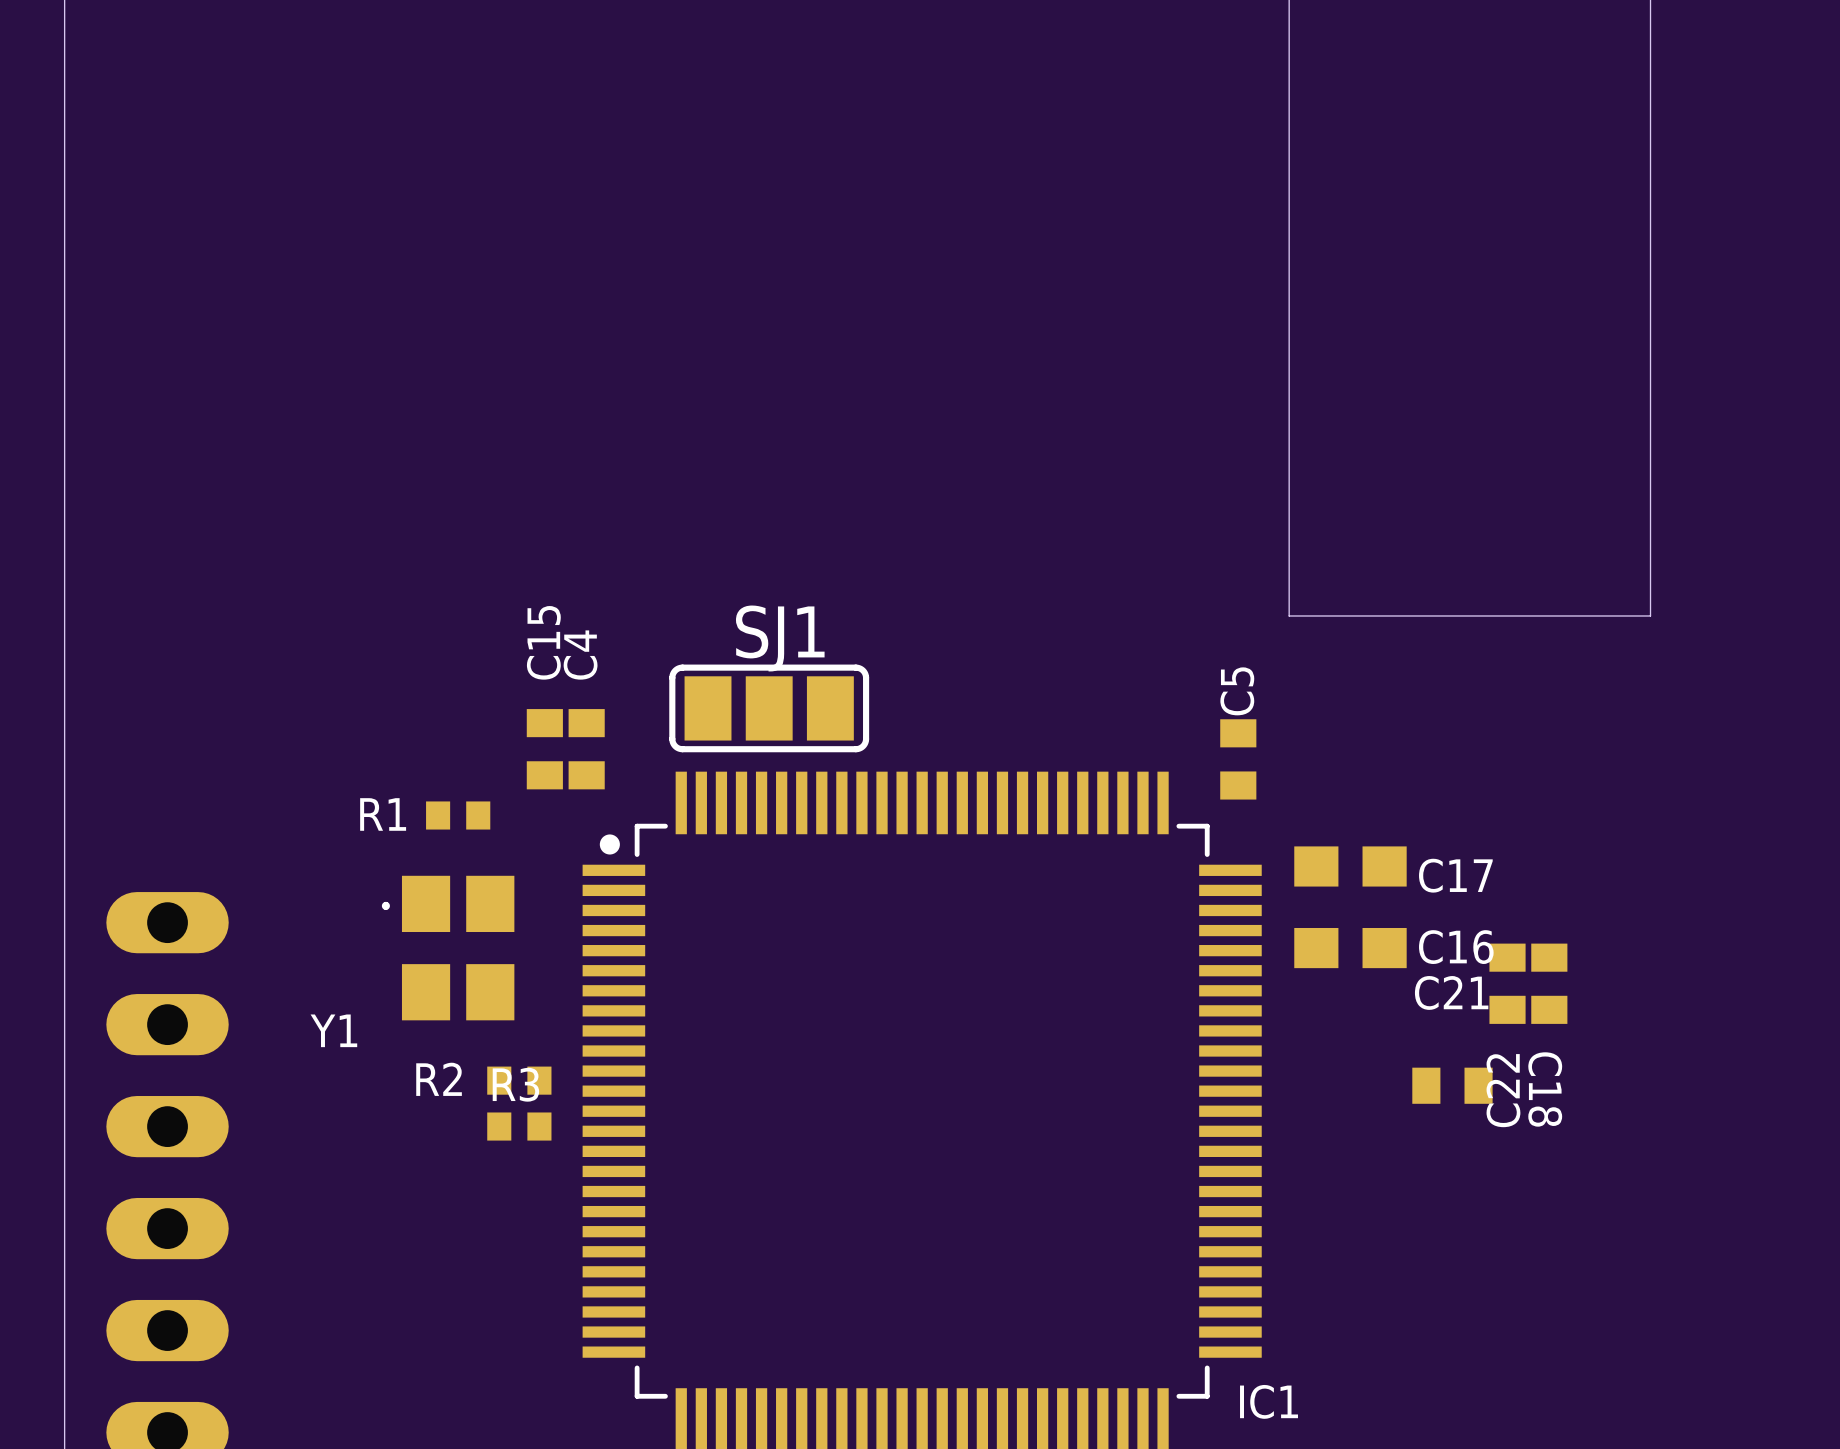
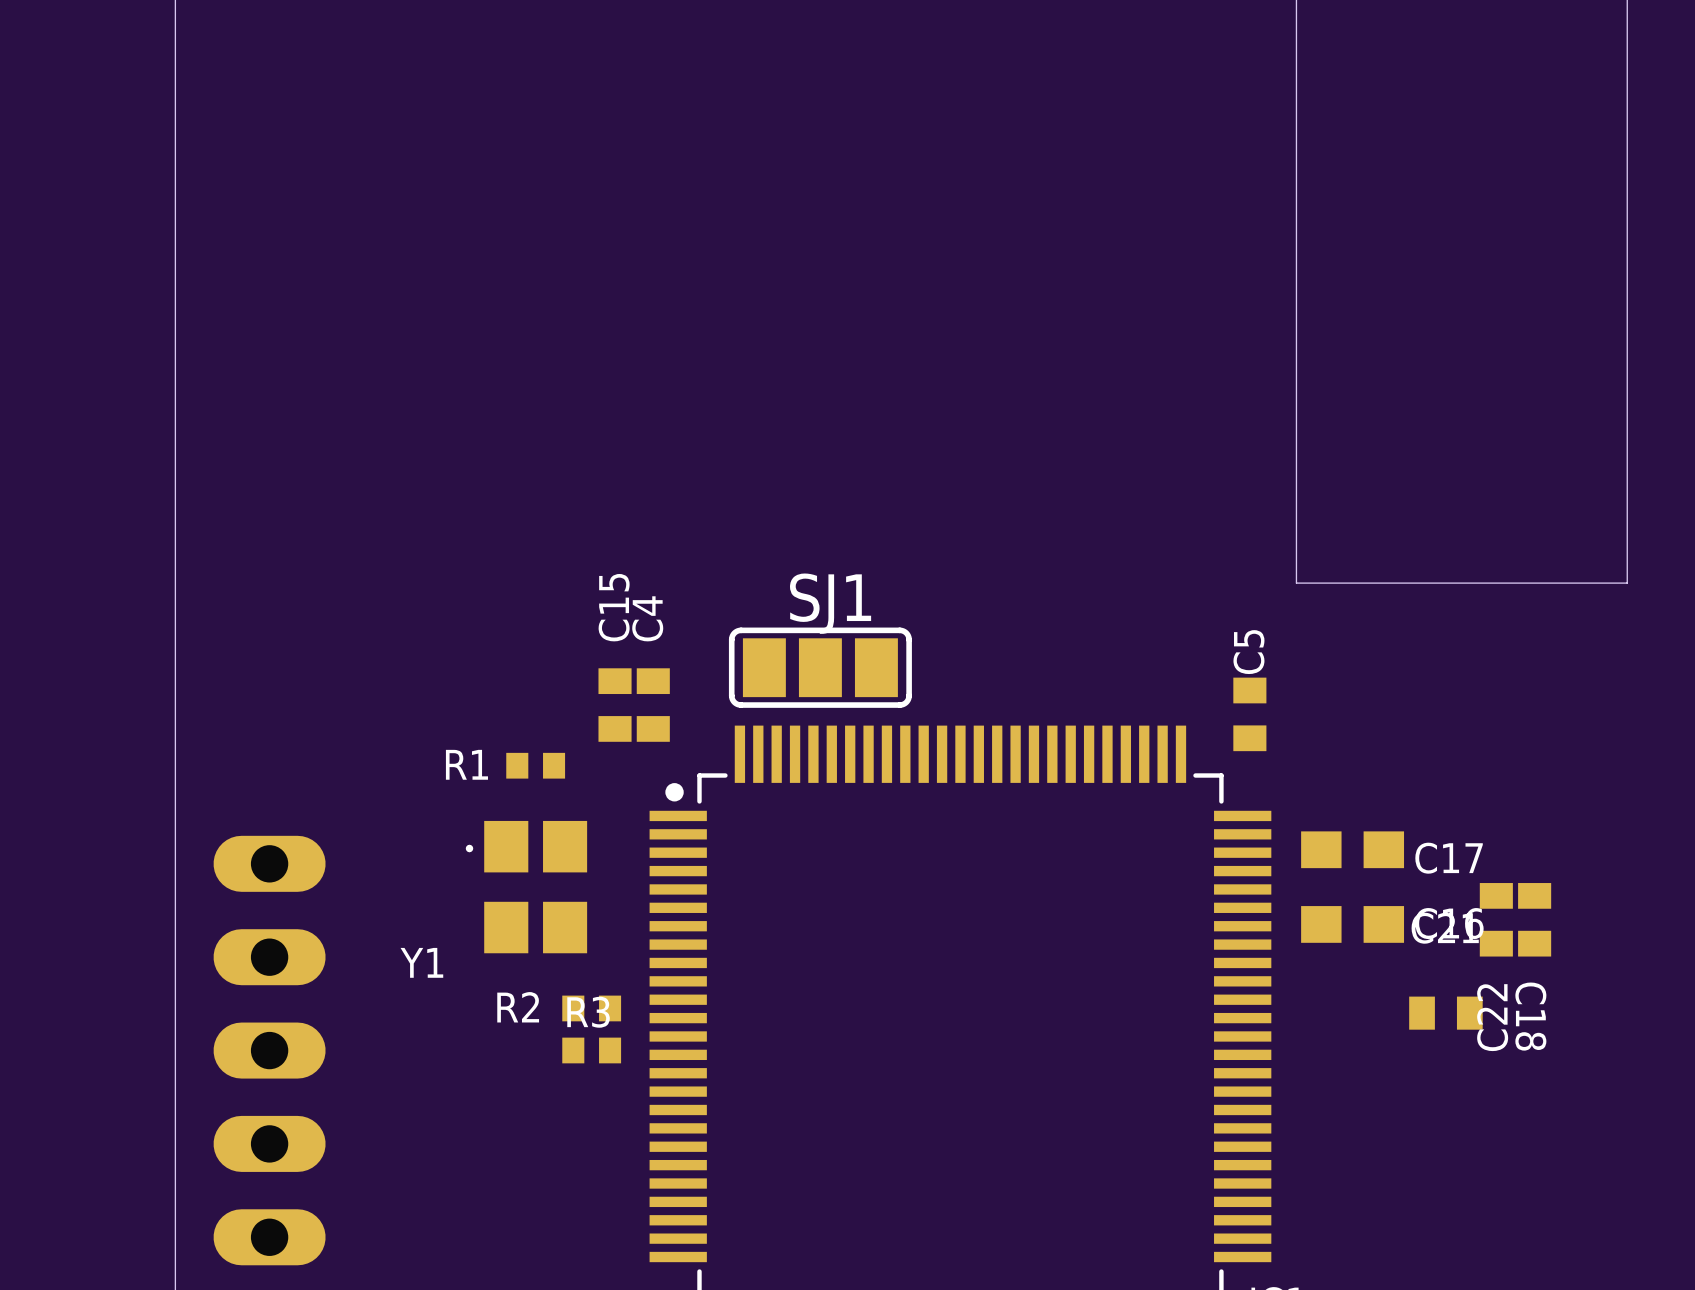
C17 position: (1350, 866) -> (1352, 849)
C16 position: (1350, 948) -> (1352, 924)

